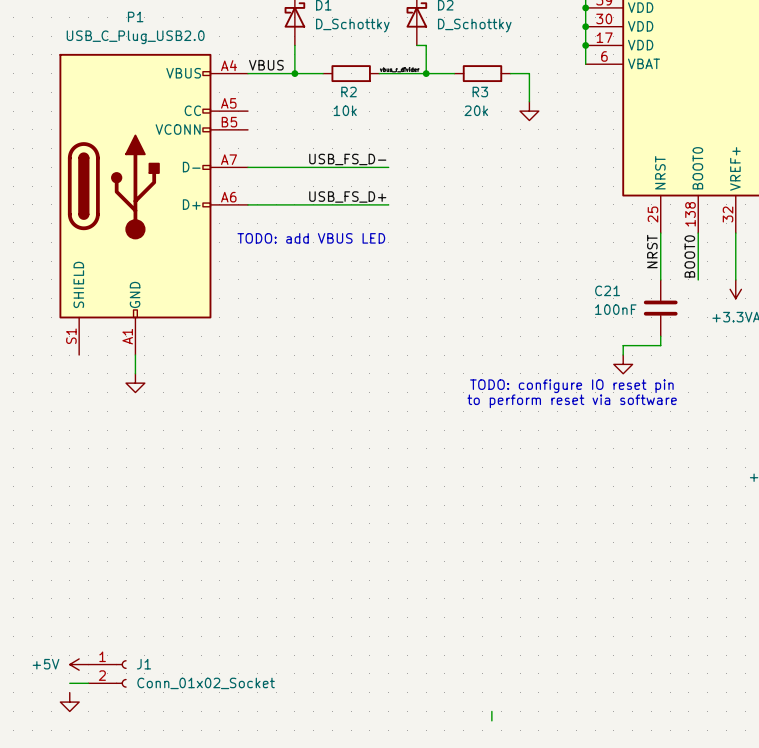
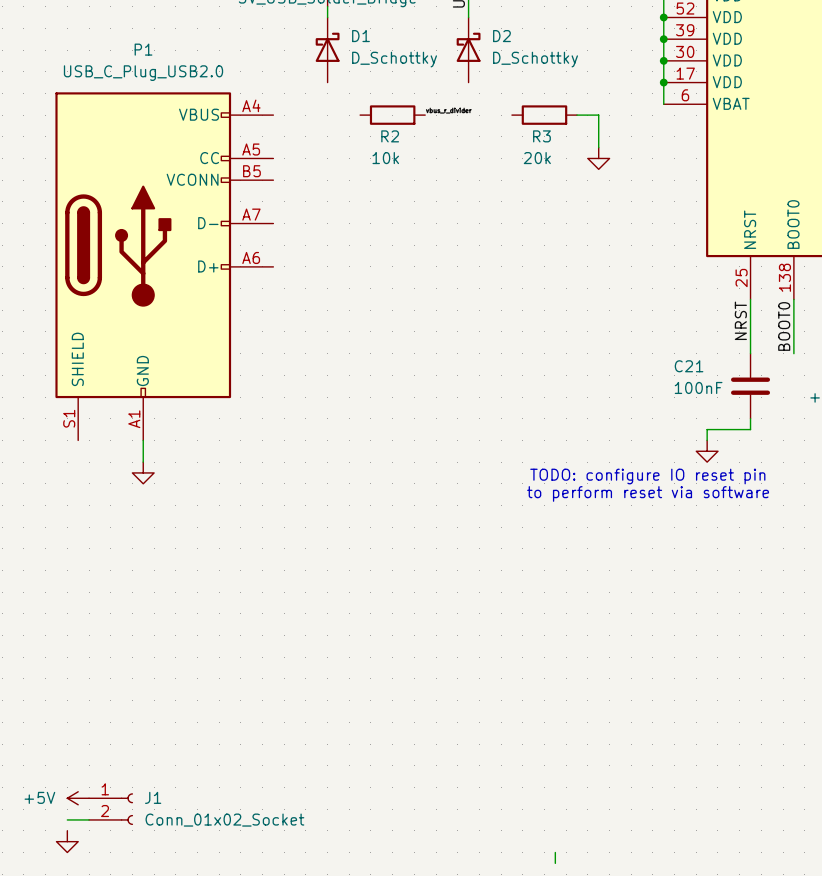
wire: (294, 45) (294, 73) -> none
wire: (416, 45) (426, 45) (426, 73) -> none
label: VBUS (266, 65) -> none
wire: (247, 73) (323, 73) -> none
junction: (294, 73) -> none
wire: (379, 73) (454, 73) -> none
junction: (426, 73) -> none
label: USB_FS_D- (347, 159) -> none
wire: (247, 167) (388, 167) -> none
label: USB_FS_D+ (347, 196) -> none
wire: (247, 204) (388, 204) -> none
text: TODO: add VBUS LED (311, 238) -> none

